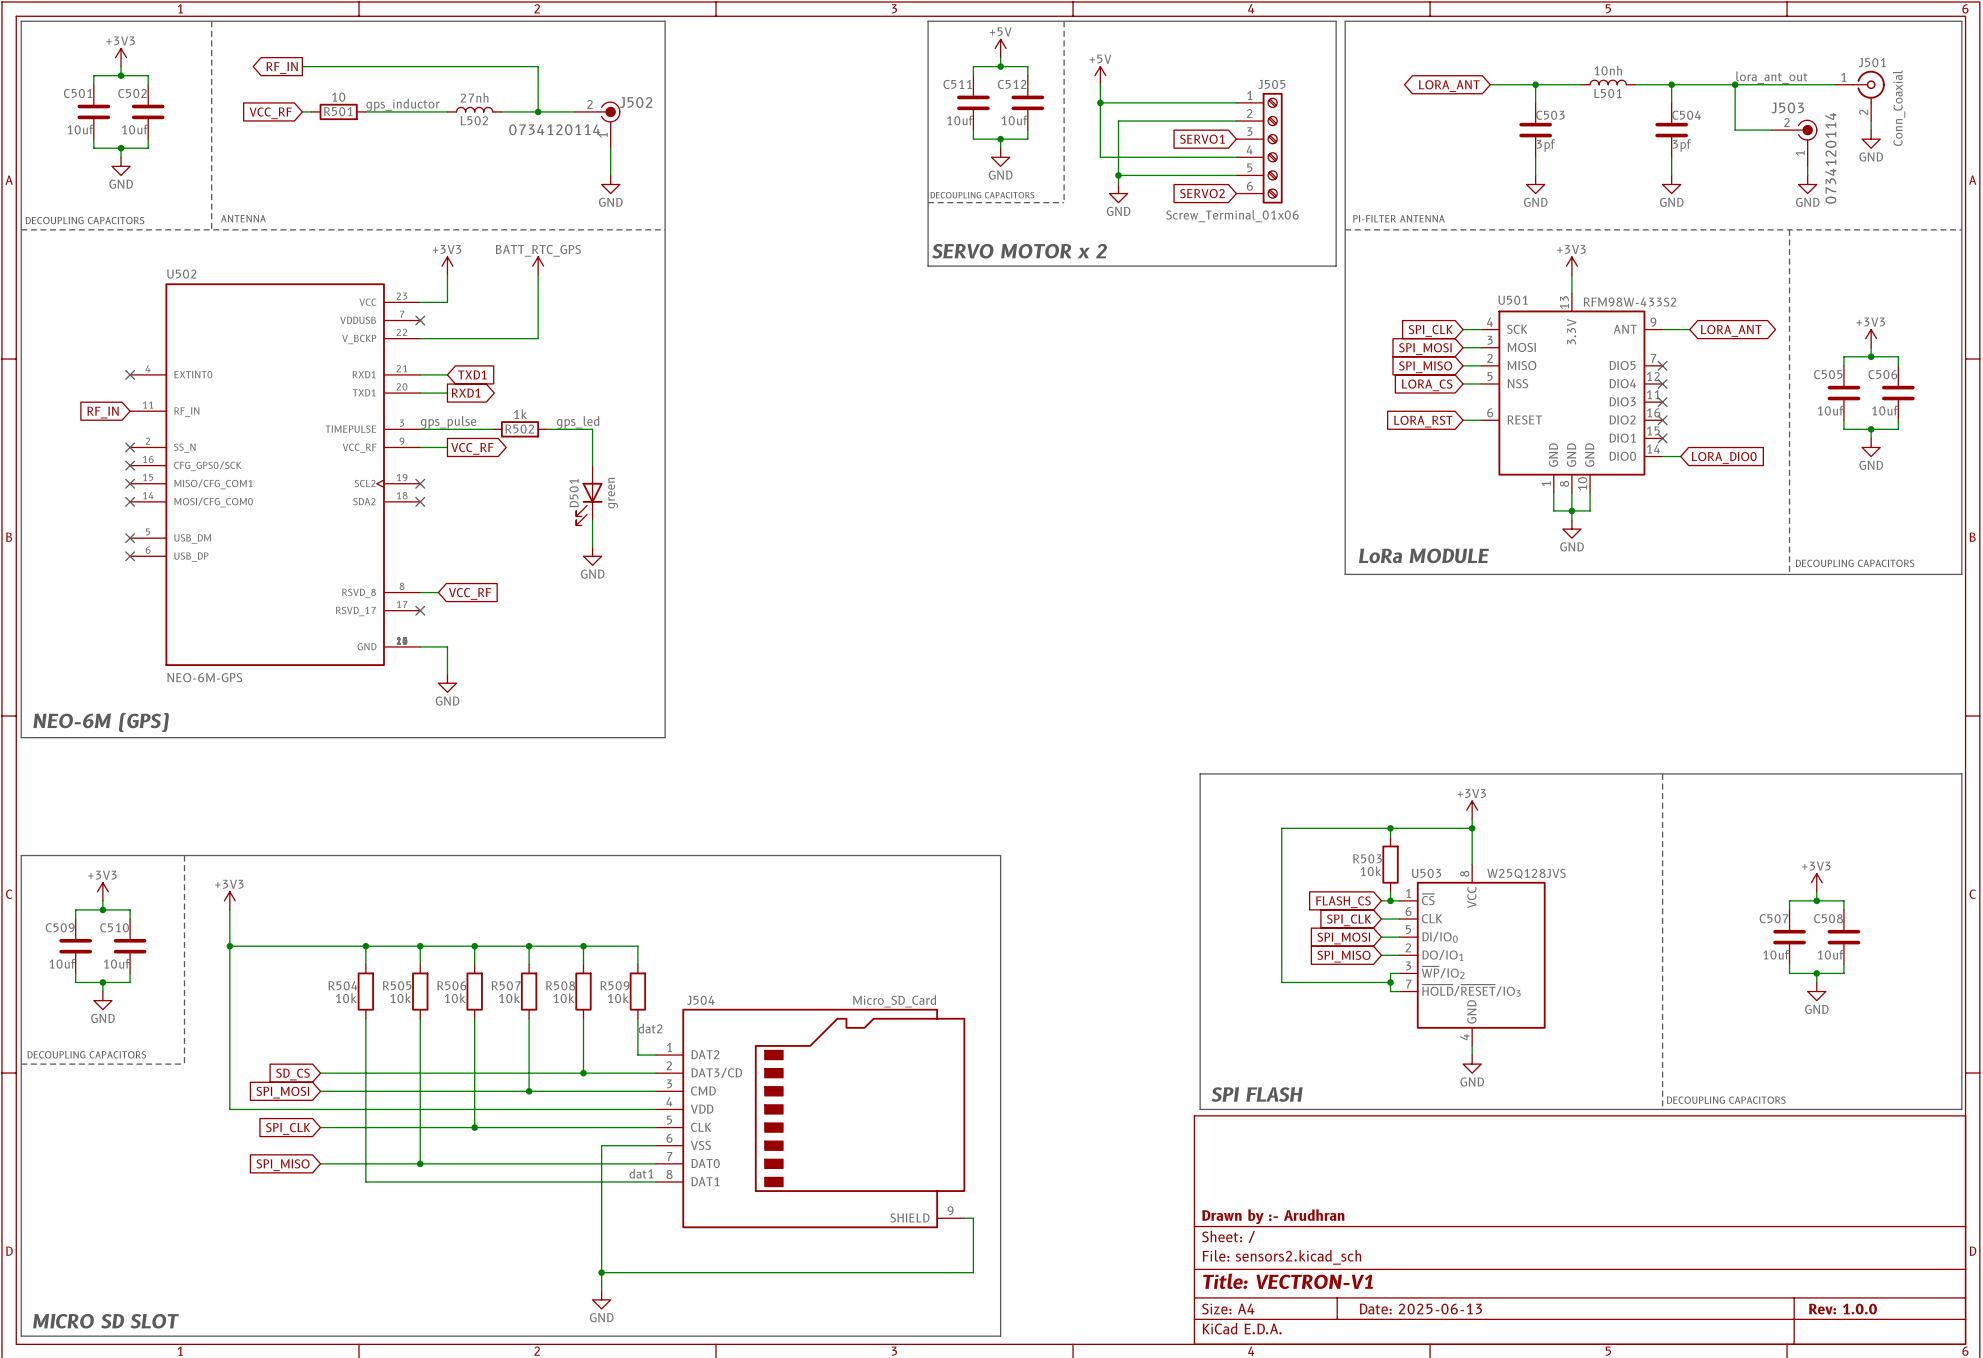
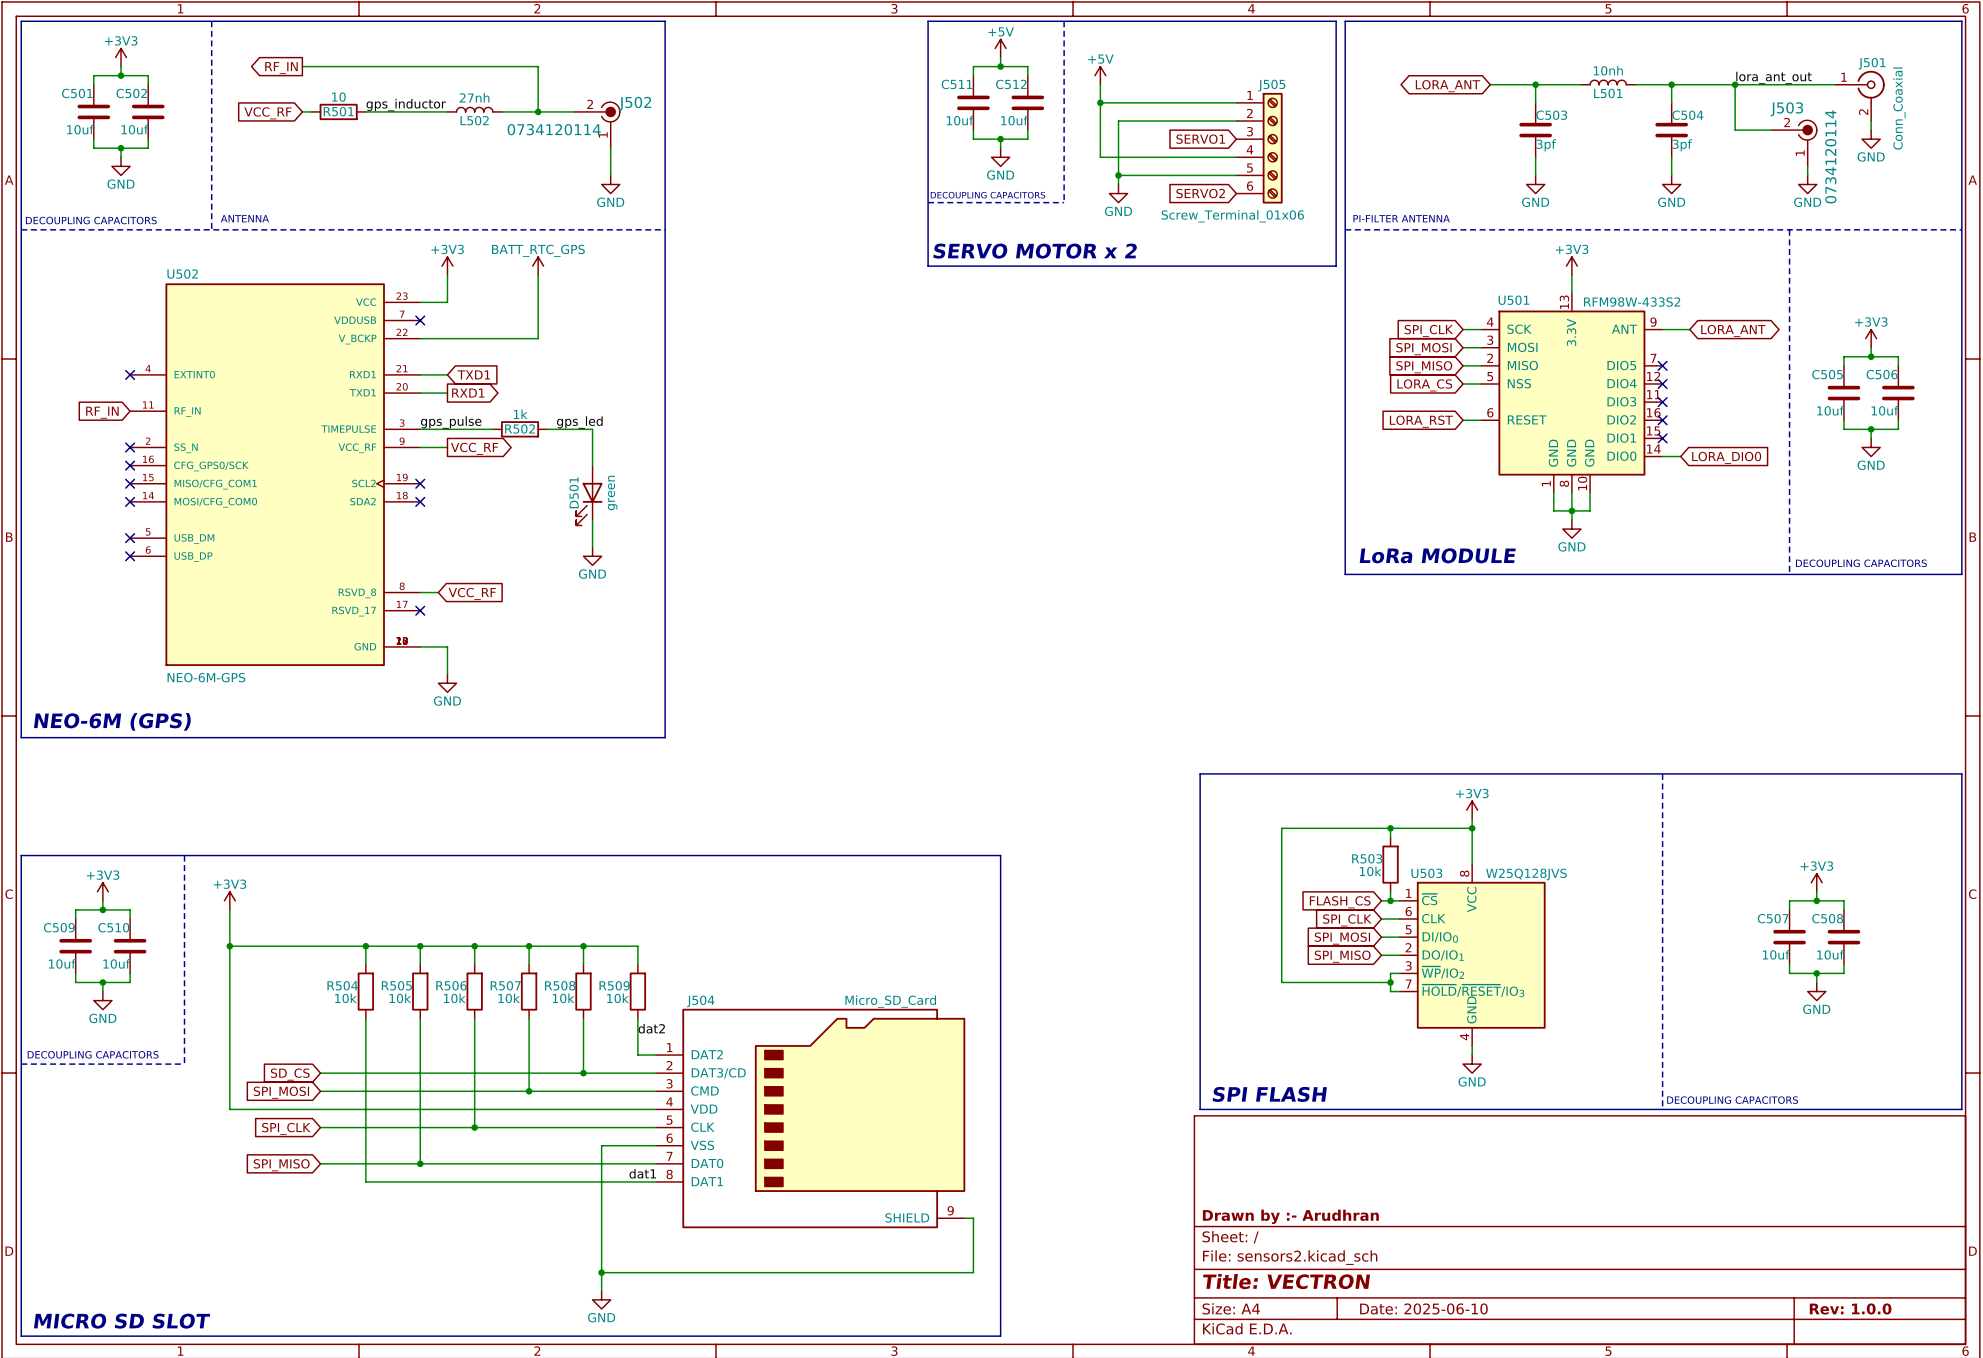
title block: Title: VECTRON-V1 (1288, 1281) -> Title: VECTRON (1286, 1281)
title block: Date: 2025-06-13 (1420, 1309) -> Date: 2025-06-10 (1423, 1308)

